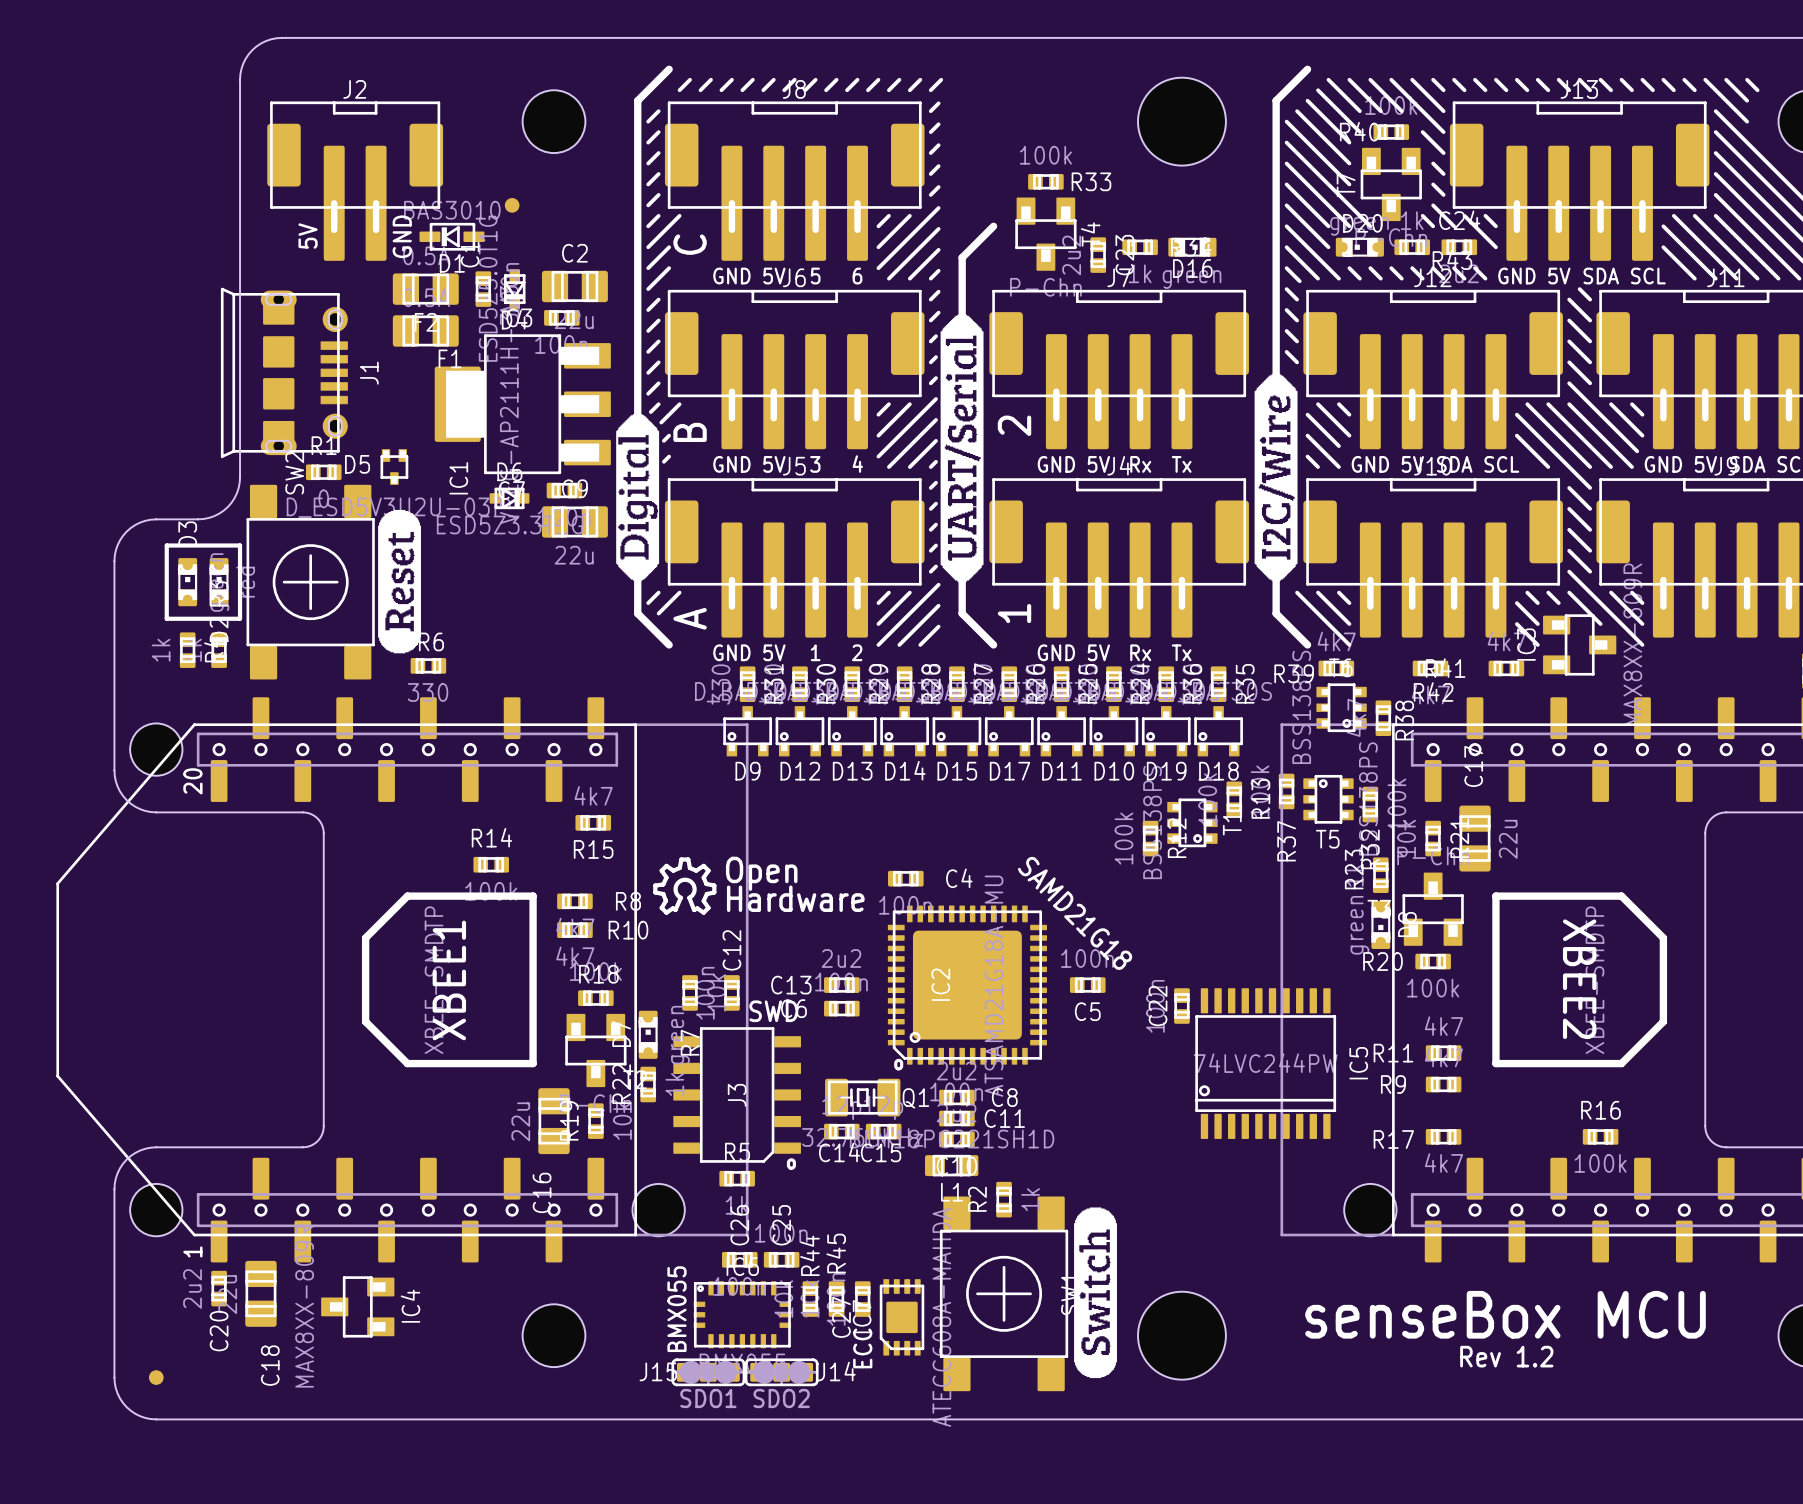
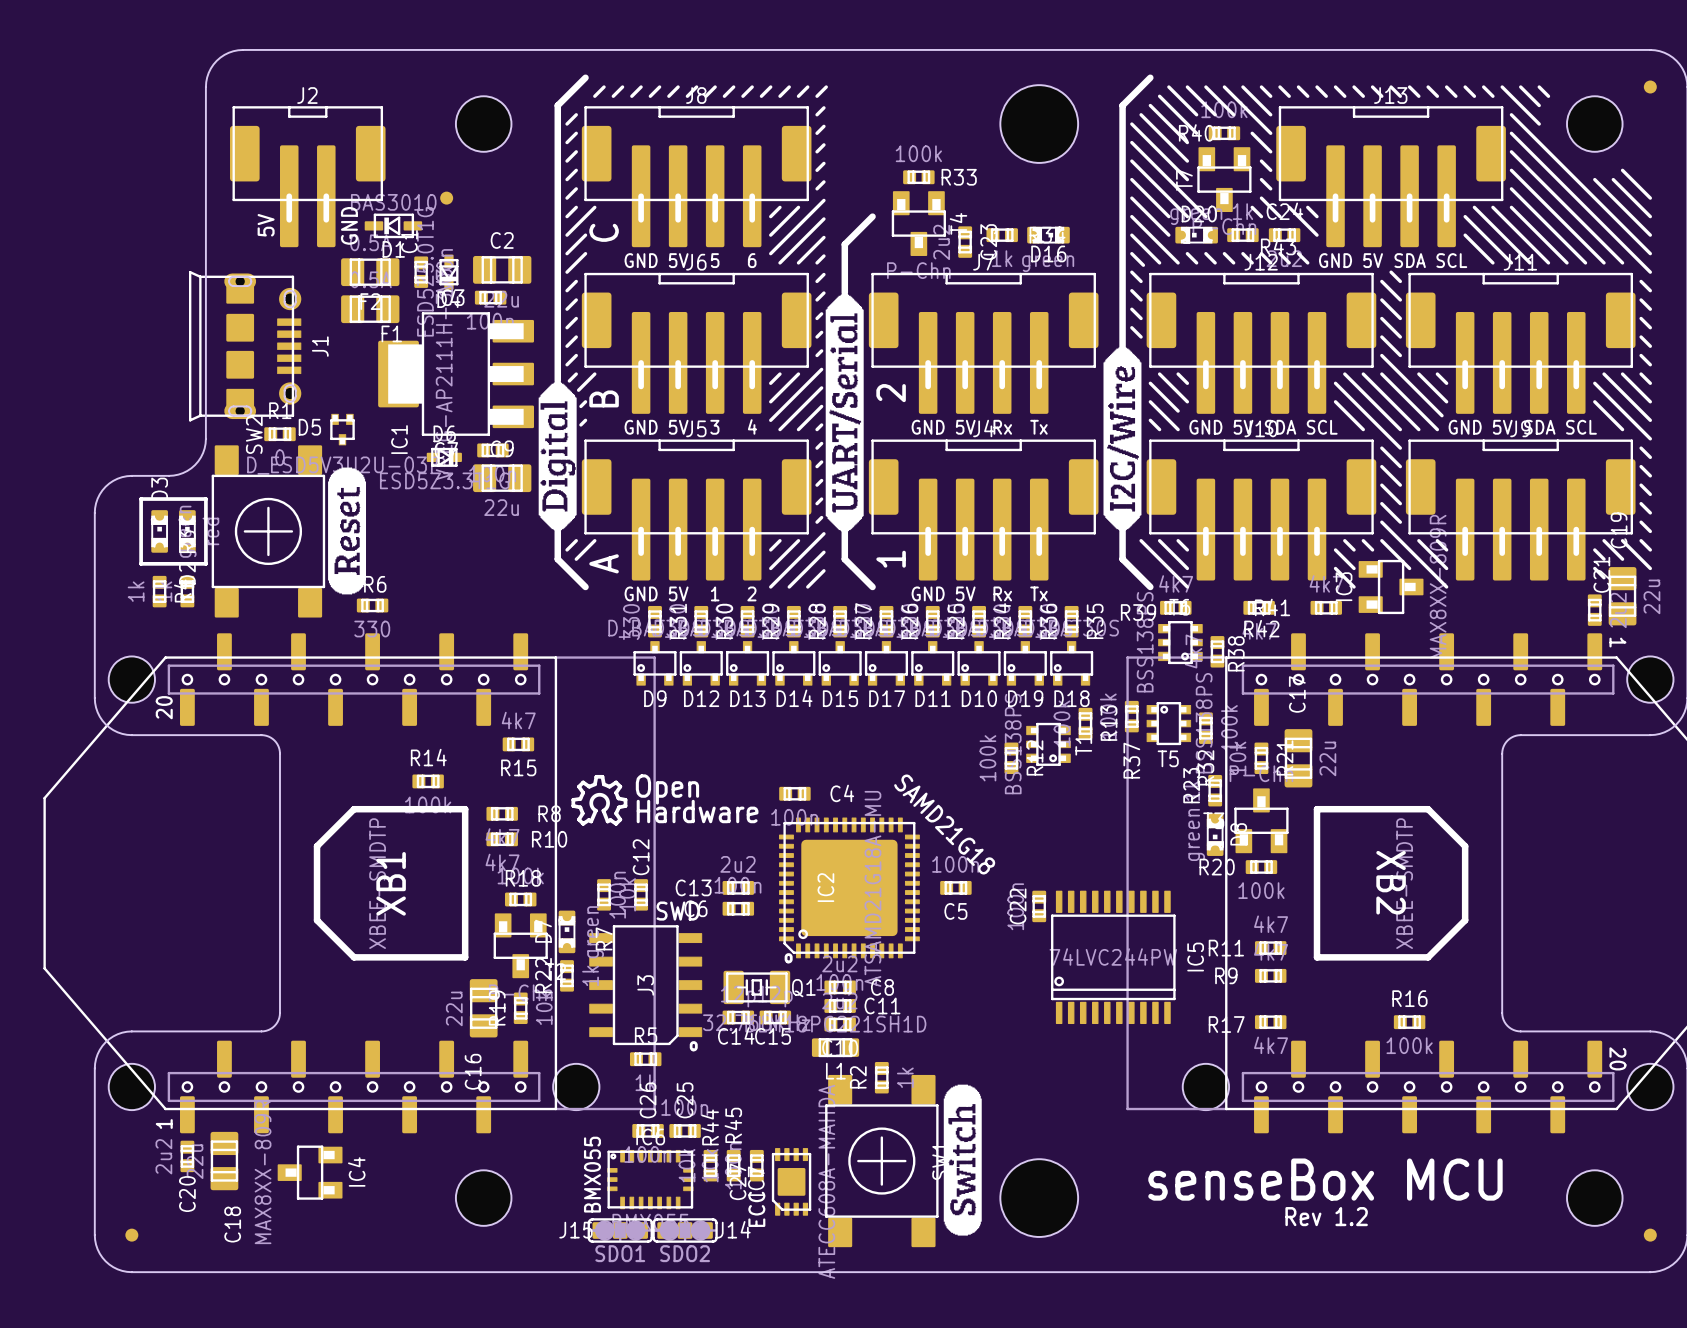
XBEE2 name: XBEE2 (1579, 979) -> XB2 (1391, 882)
XBEE1 name: XBEE1 (449, 980) -> XB1 (391, 883)

